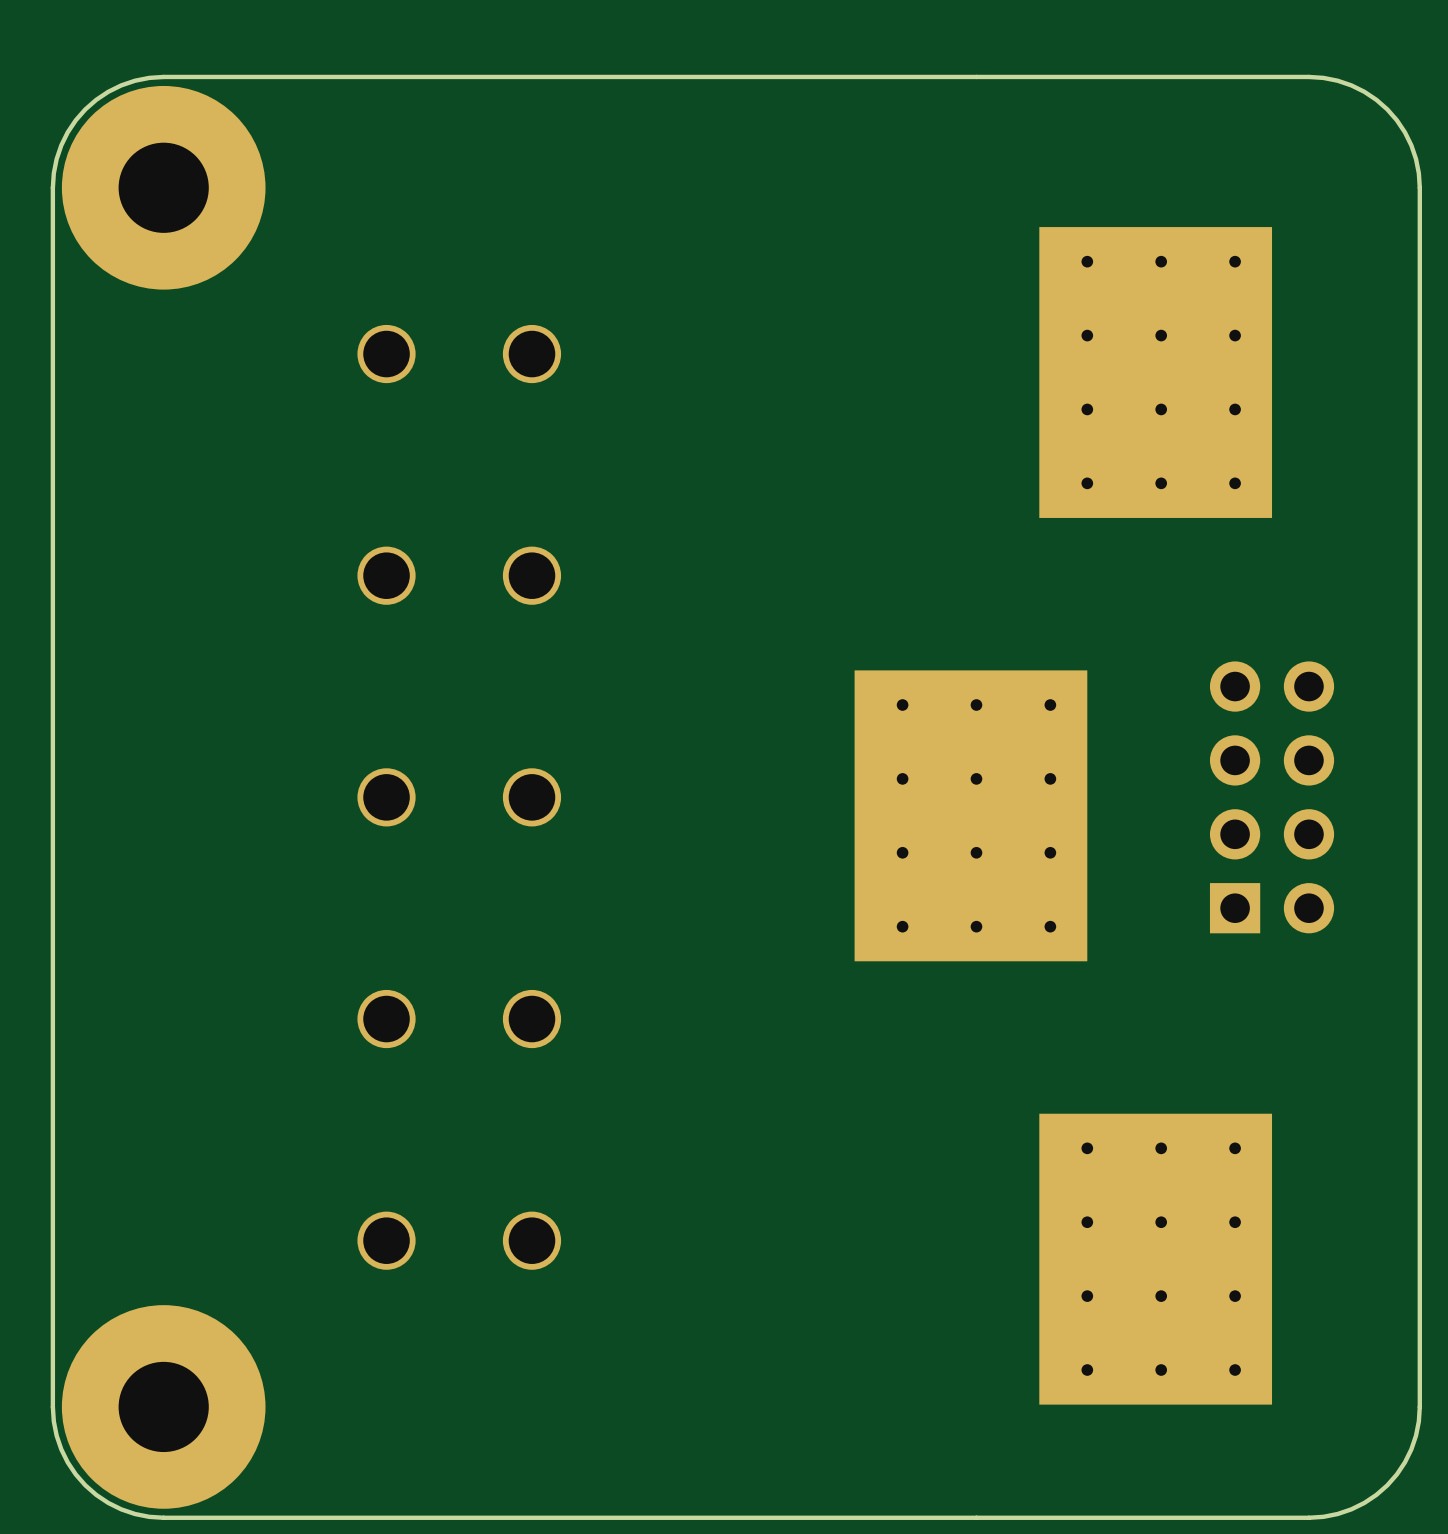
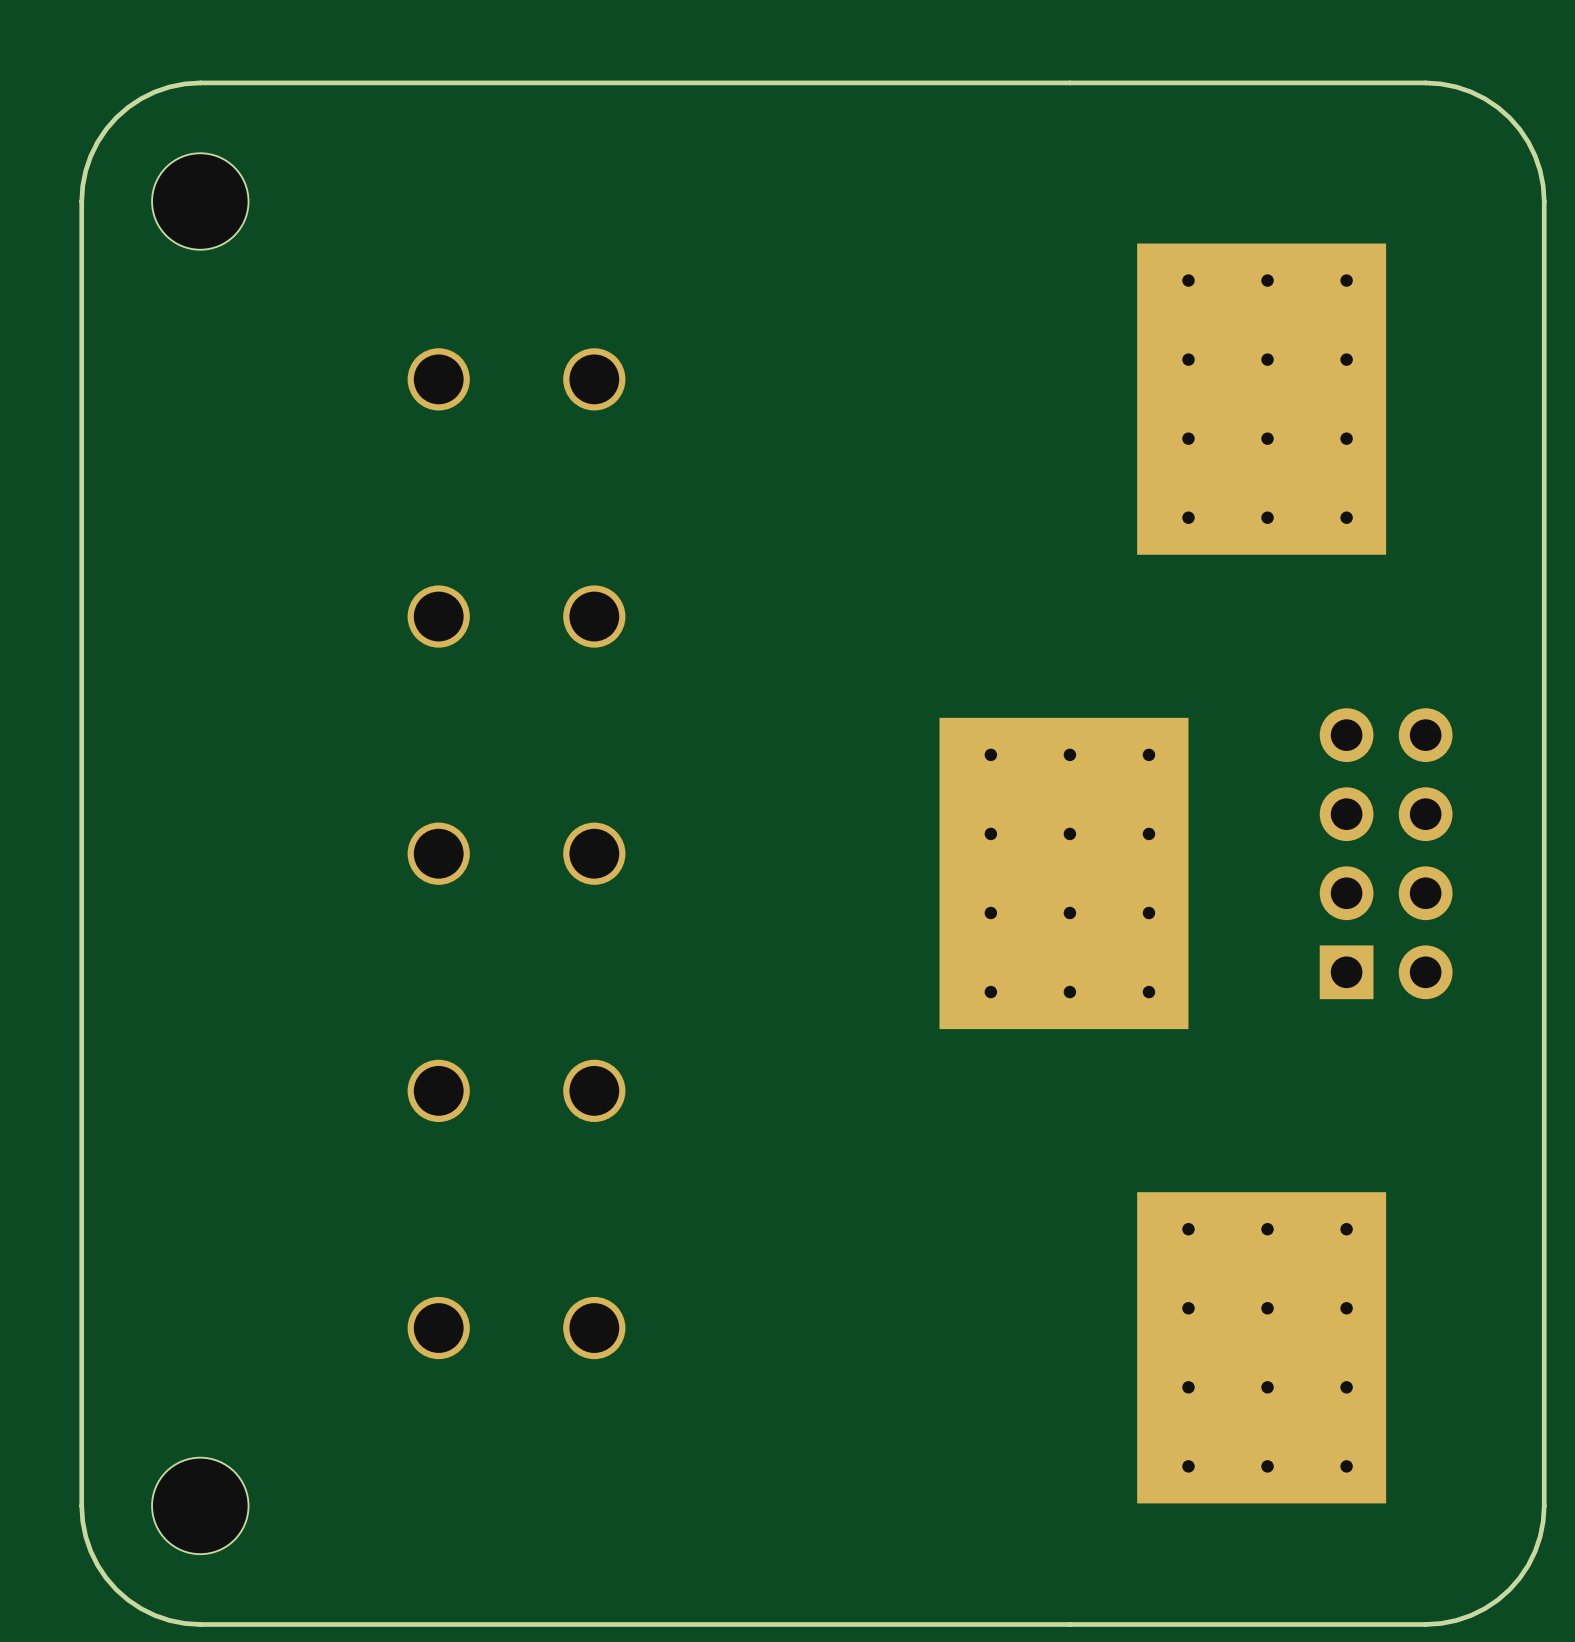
part footprint: [61, 85, 266, 290] -> [152, 153, 249, 250]
part footprint: [61, 1305, 266, 1509] -> [152, 1457, 249, 1555]

